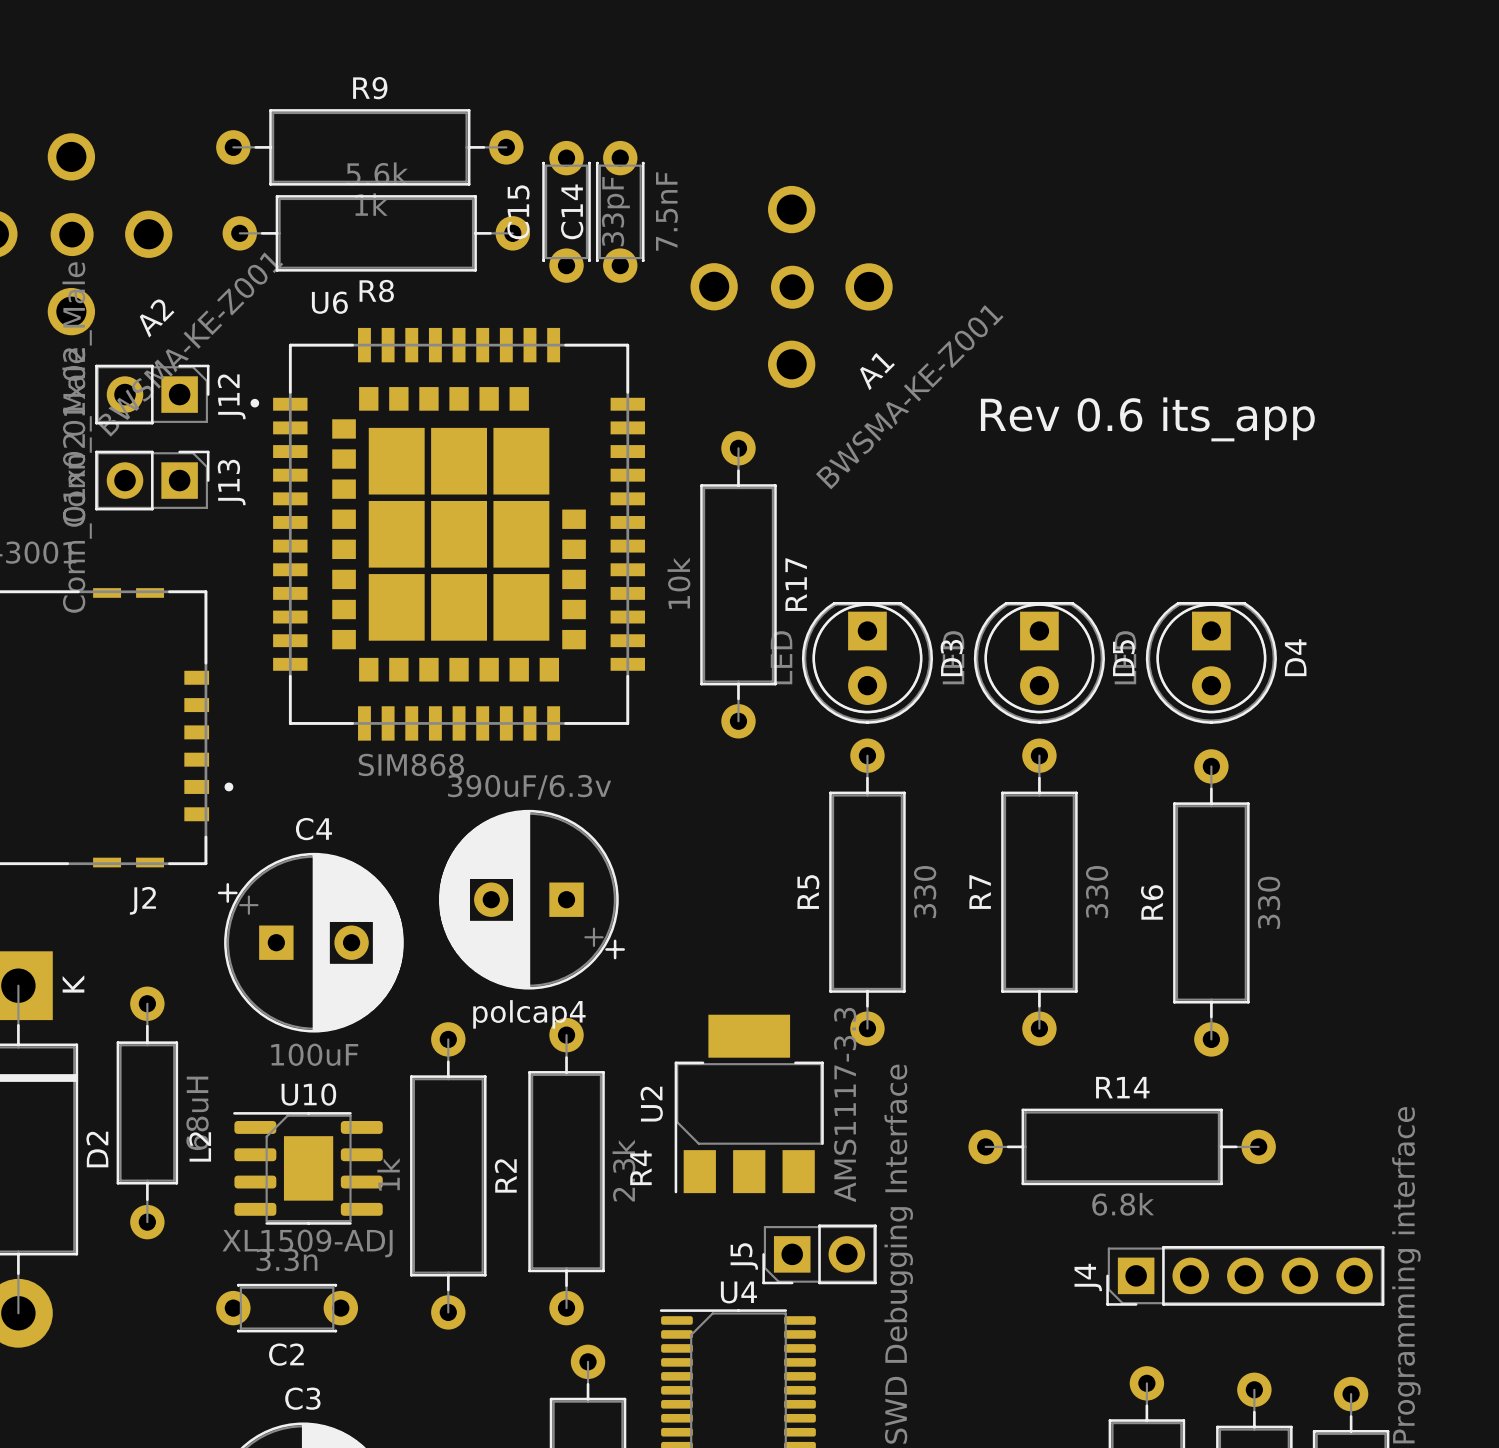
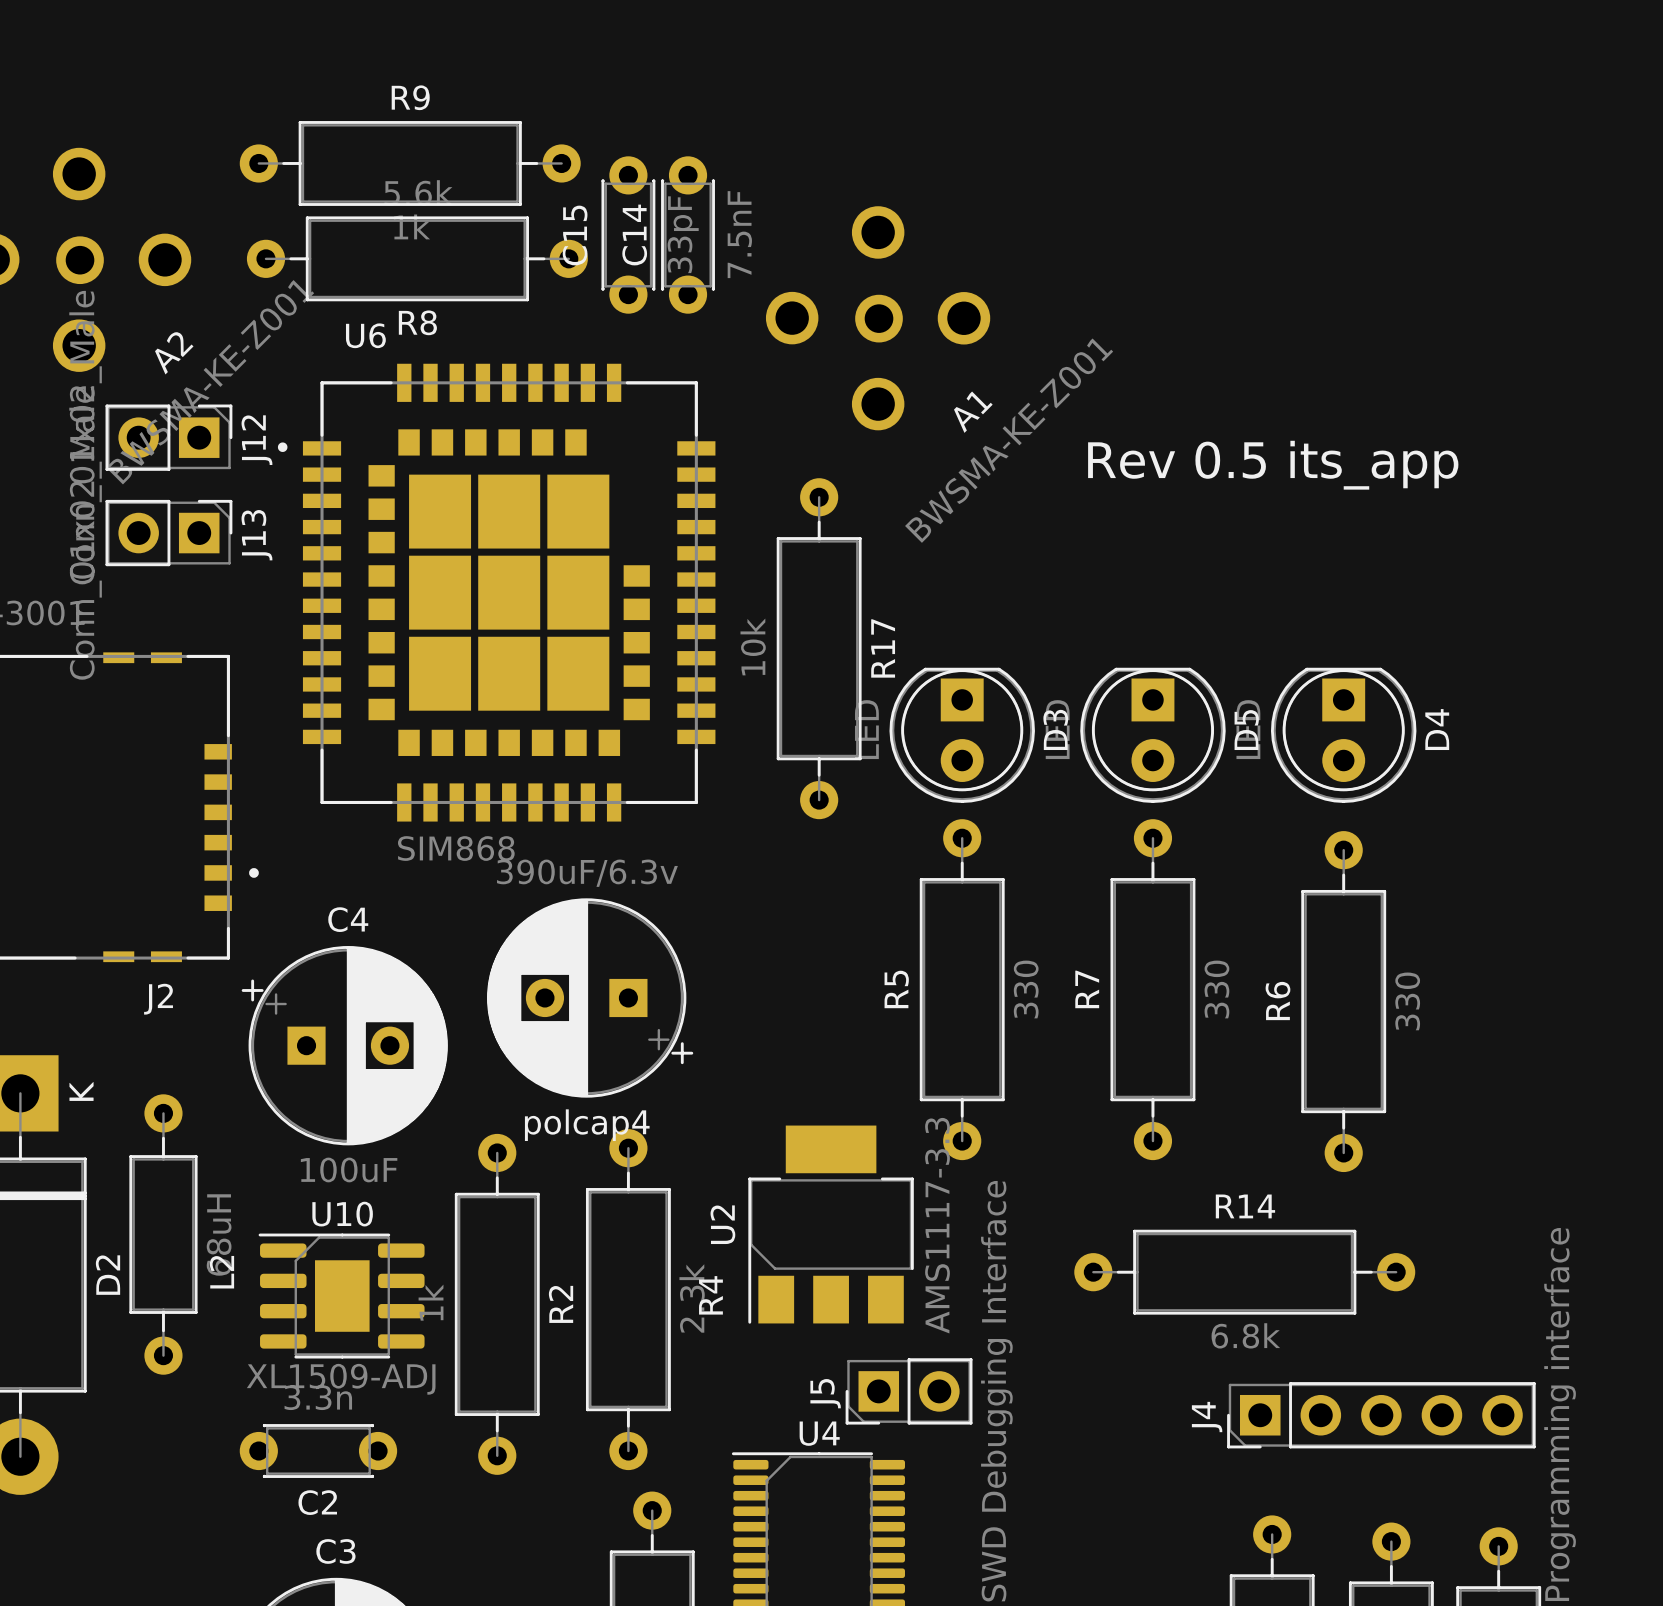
text: Rev 0.6 its_app (1147, 419) -> Rev 0.5 its_app (1273, 465)

